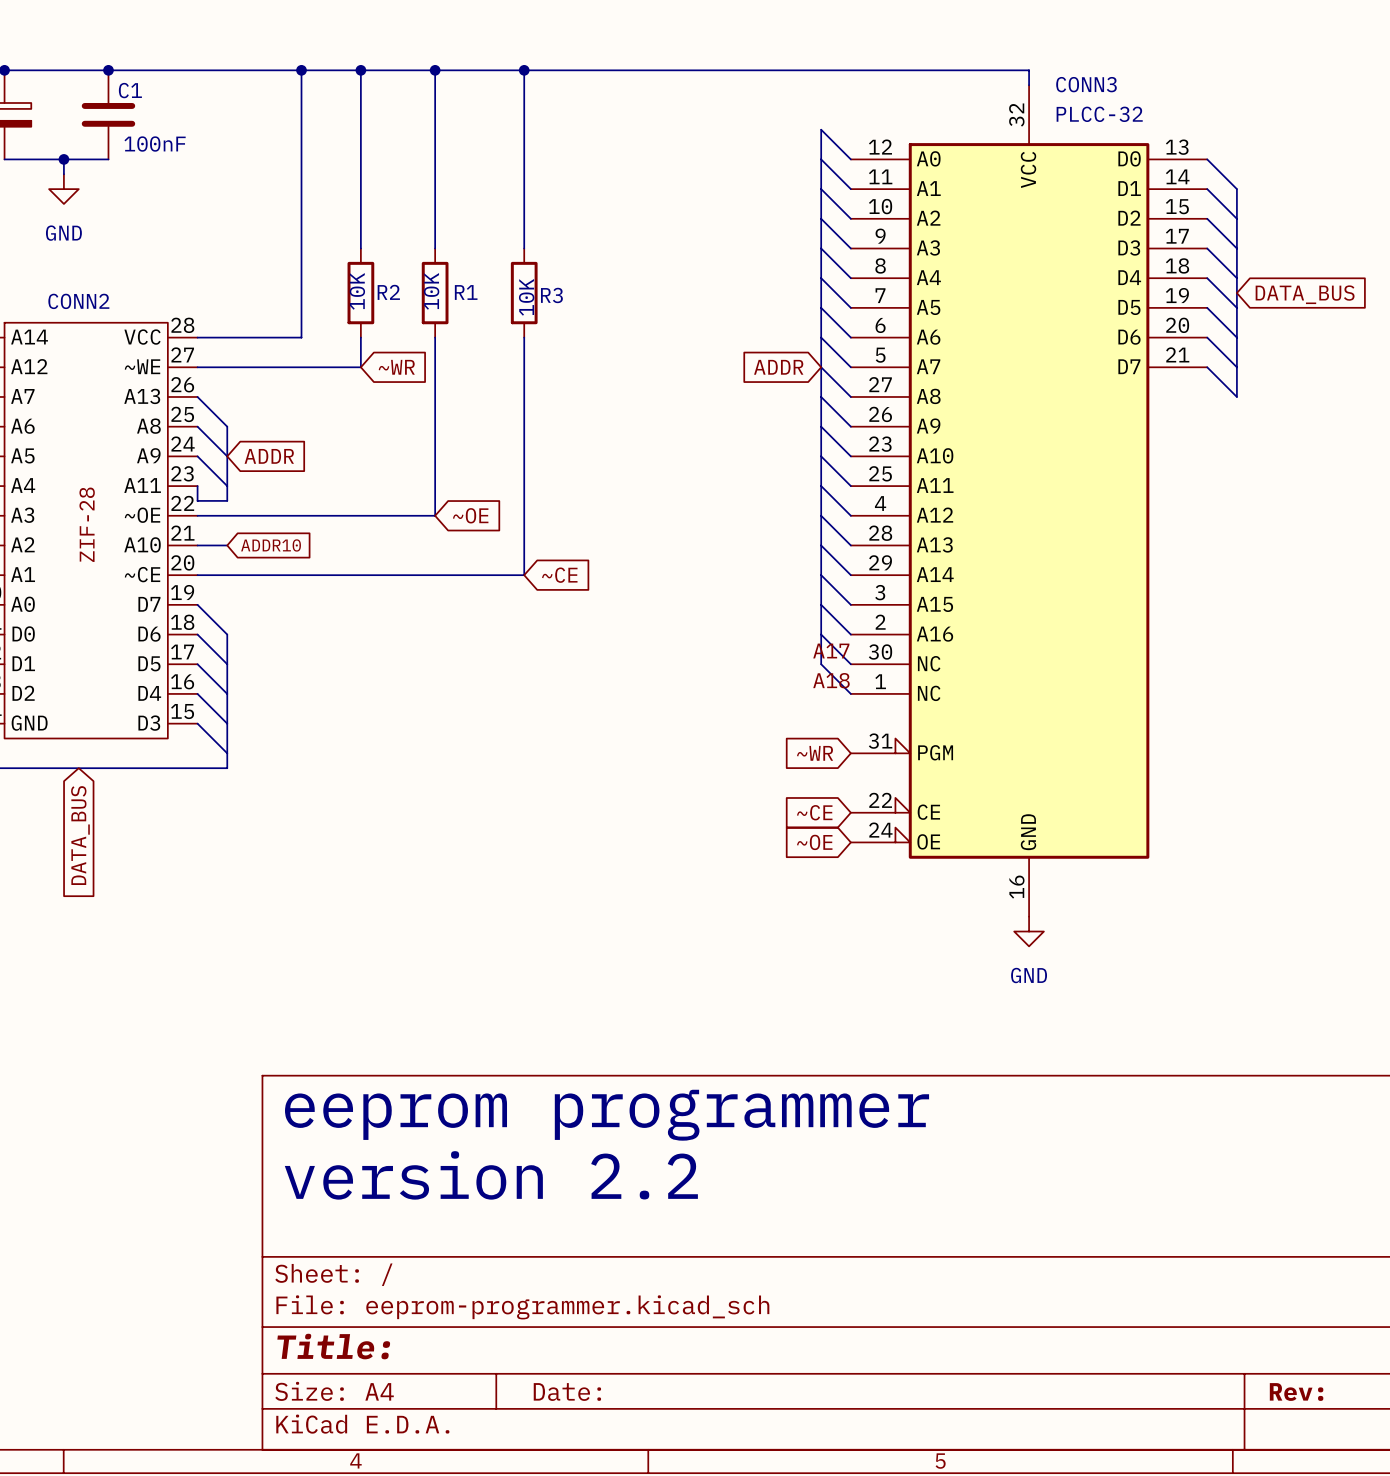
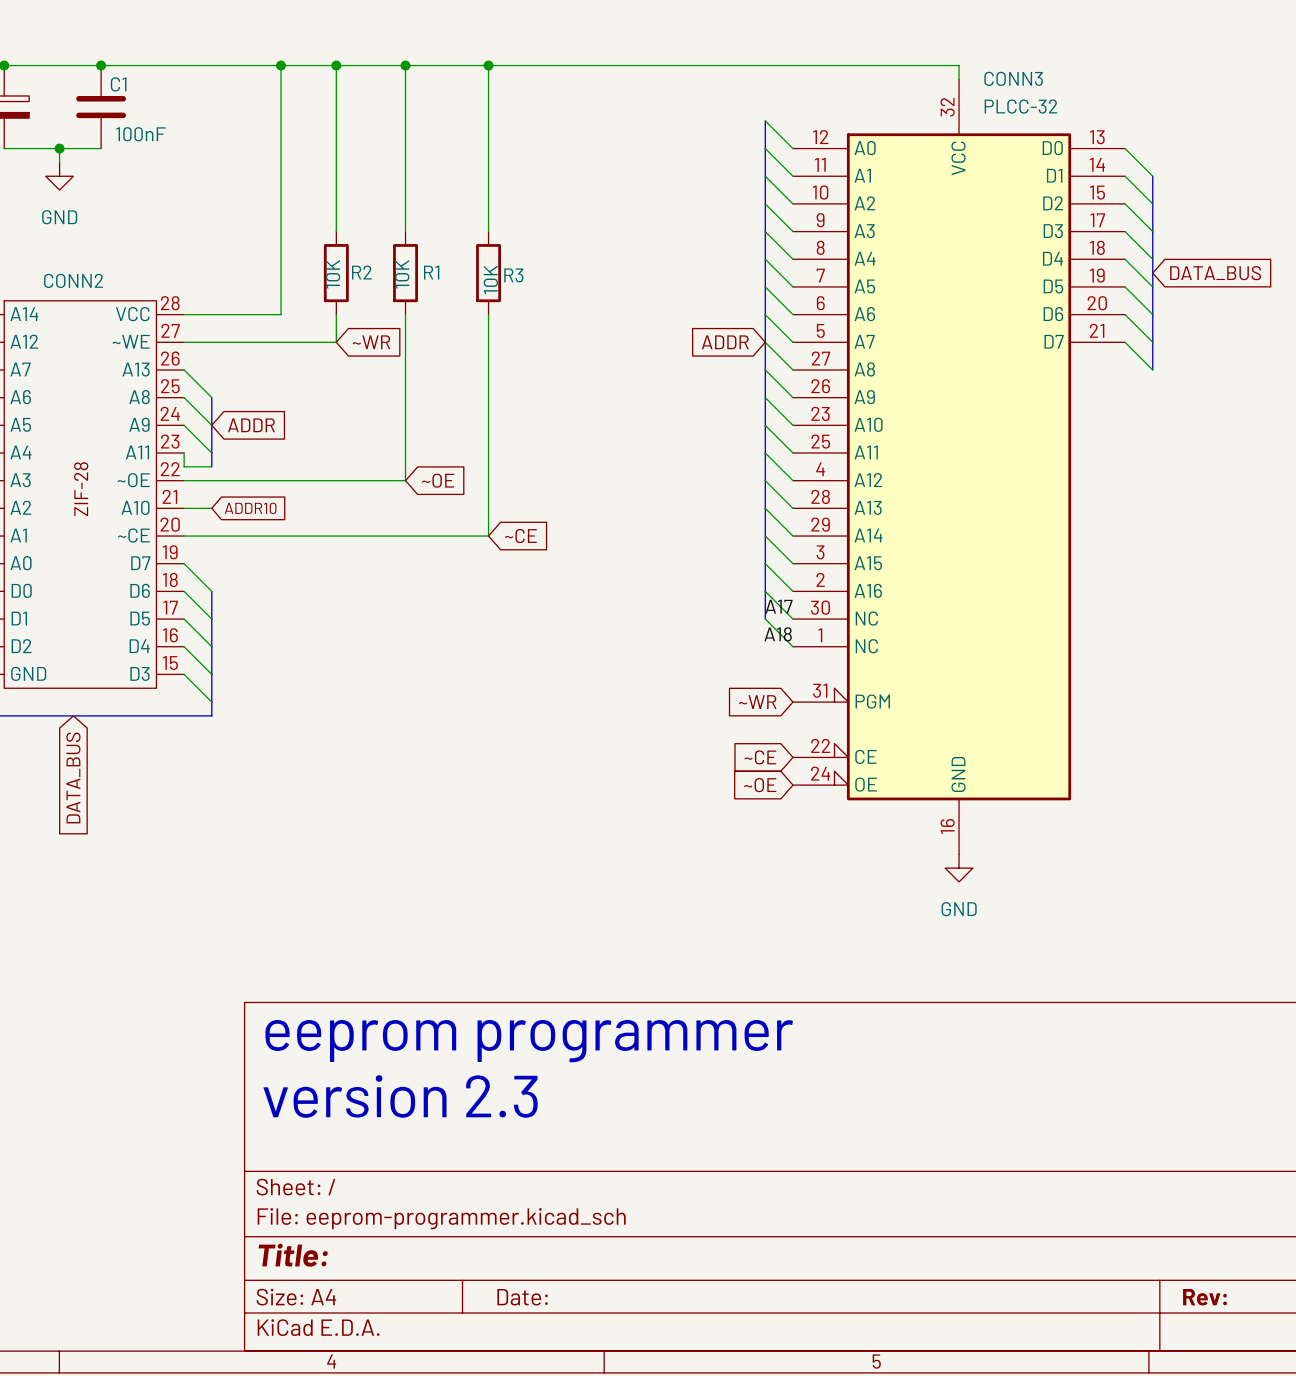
text: version 2.2 (491, 1175) -> version 2.3 (400, 1096)

